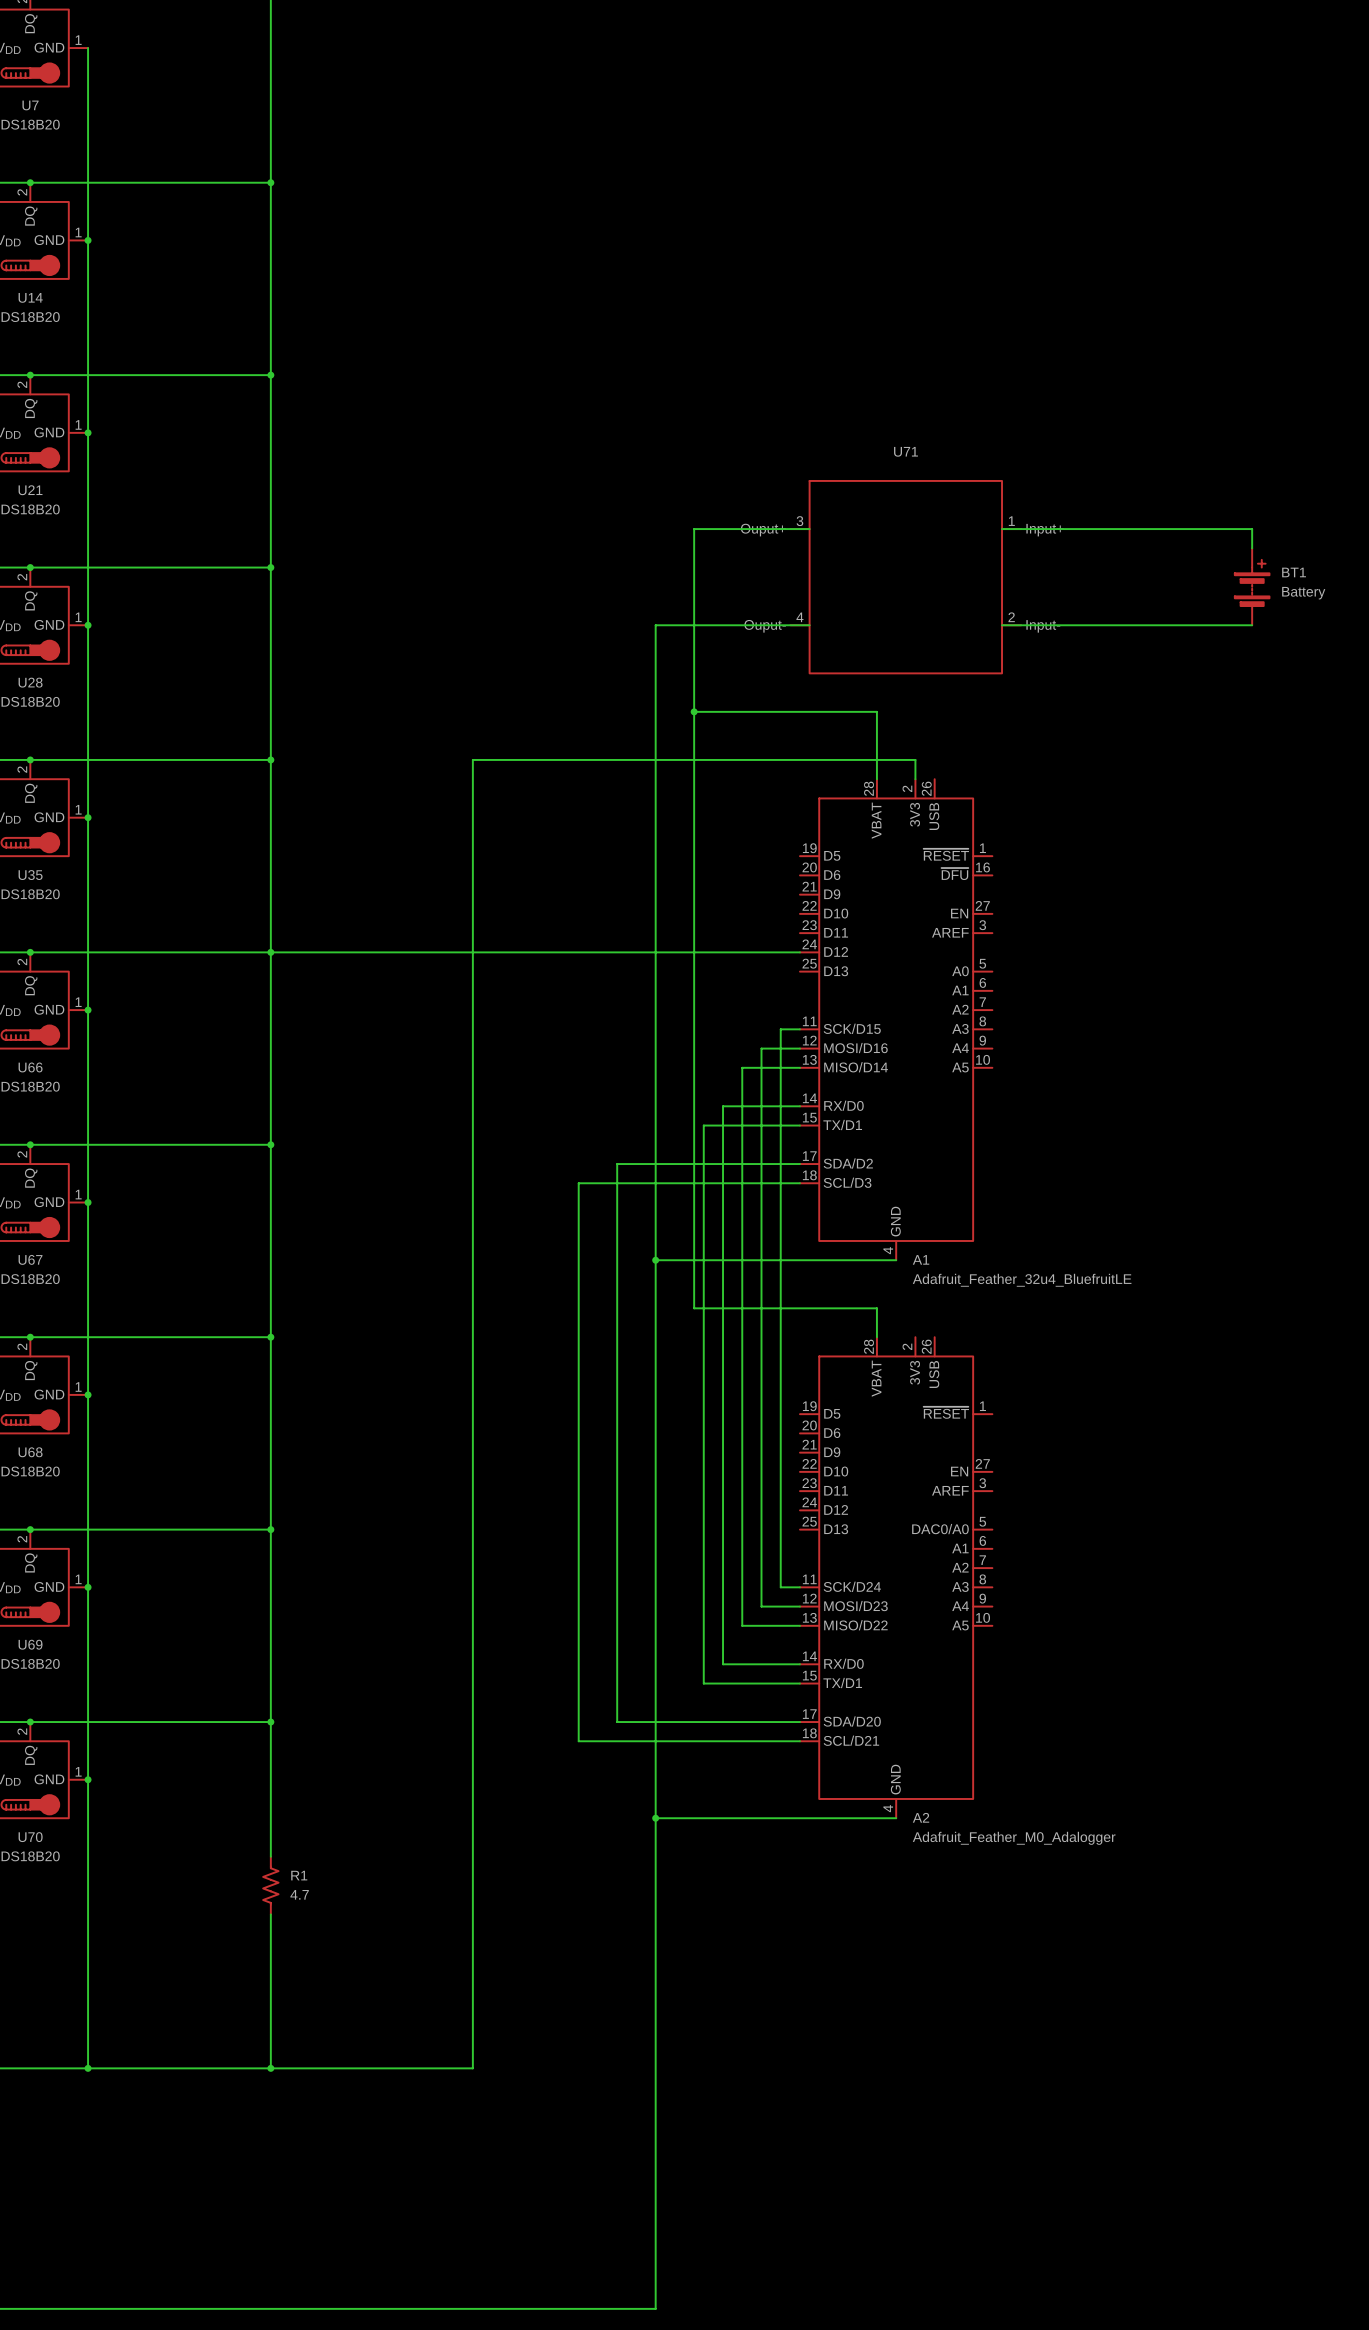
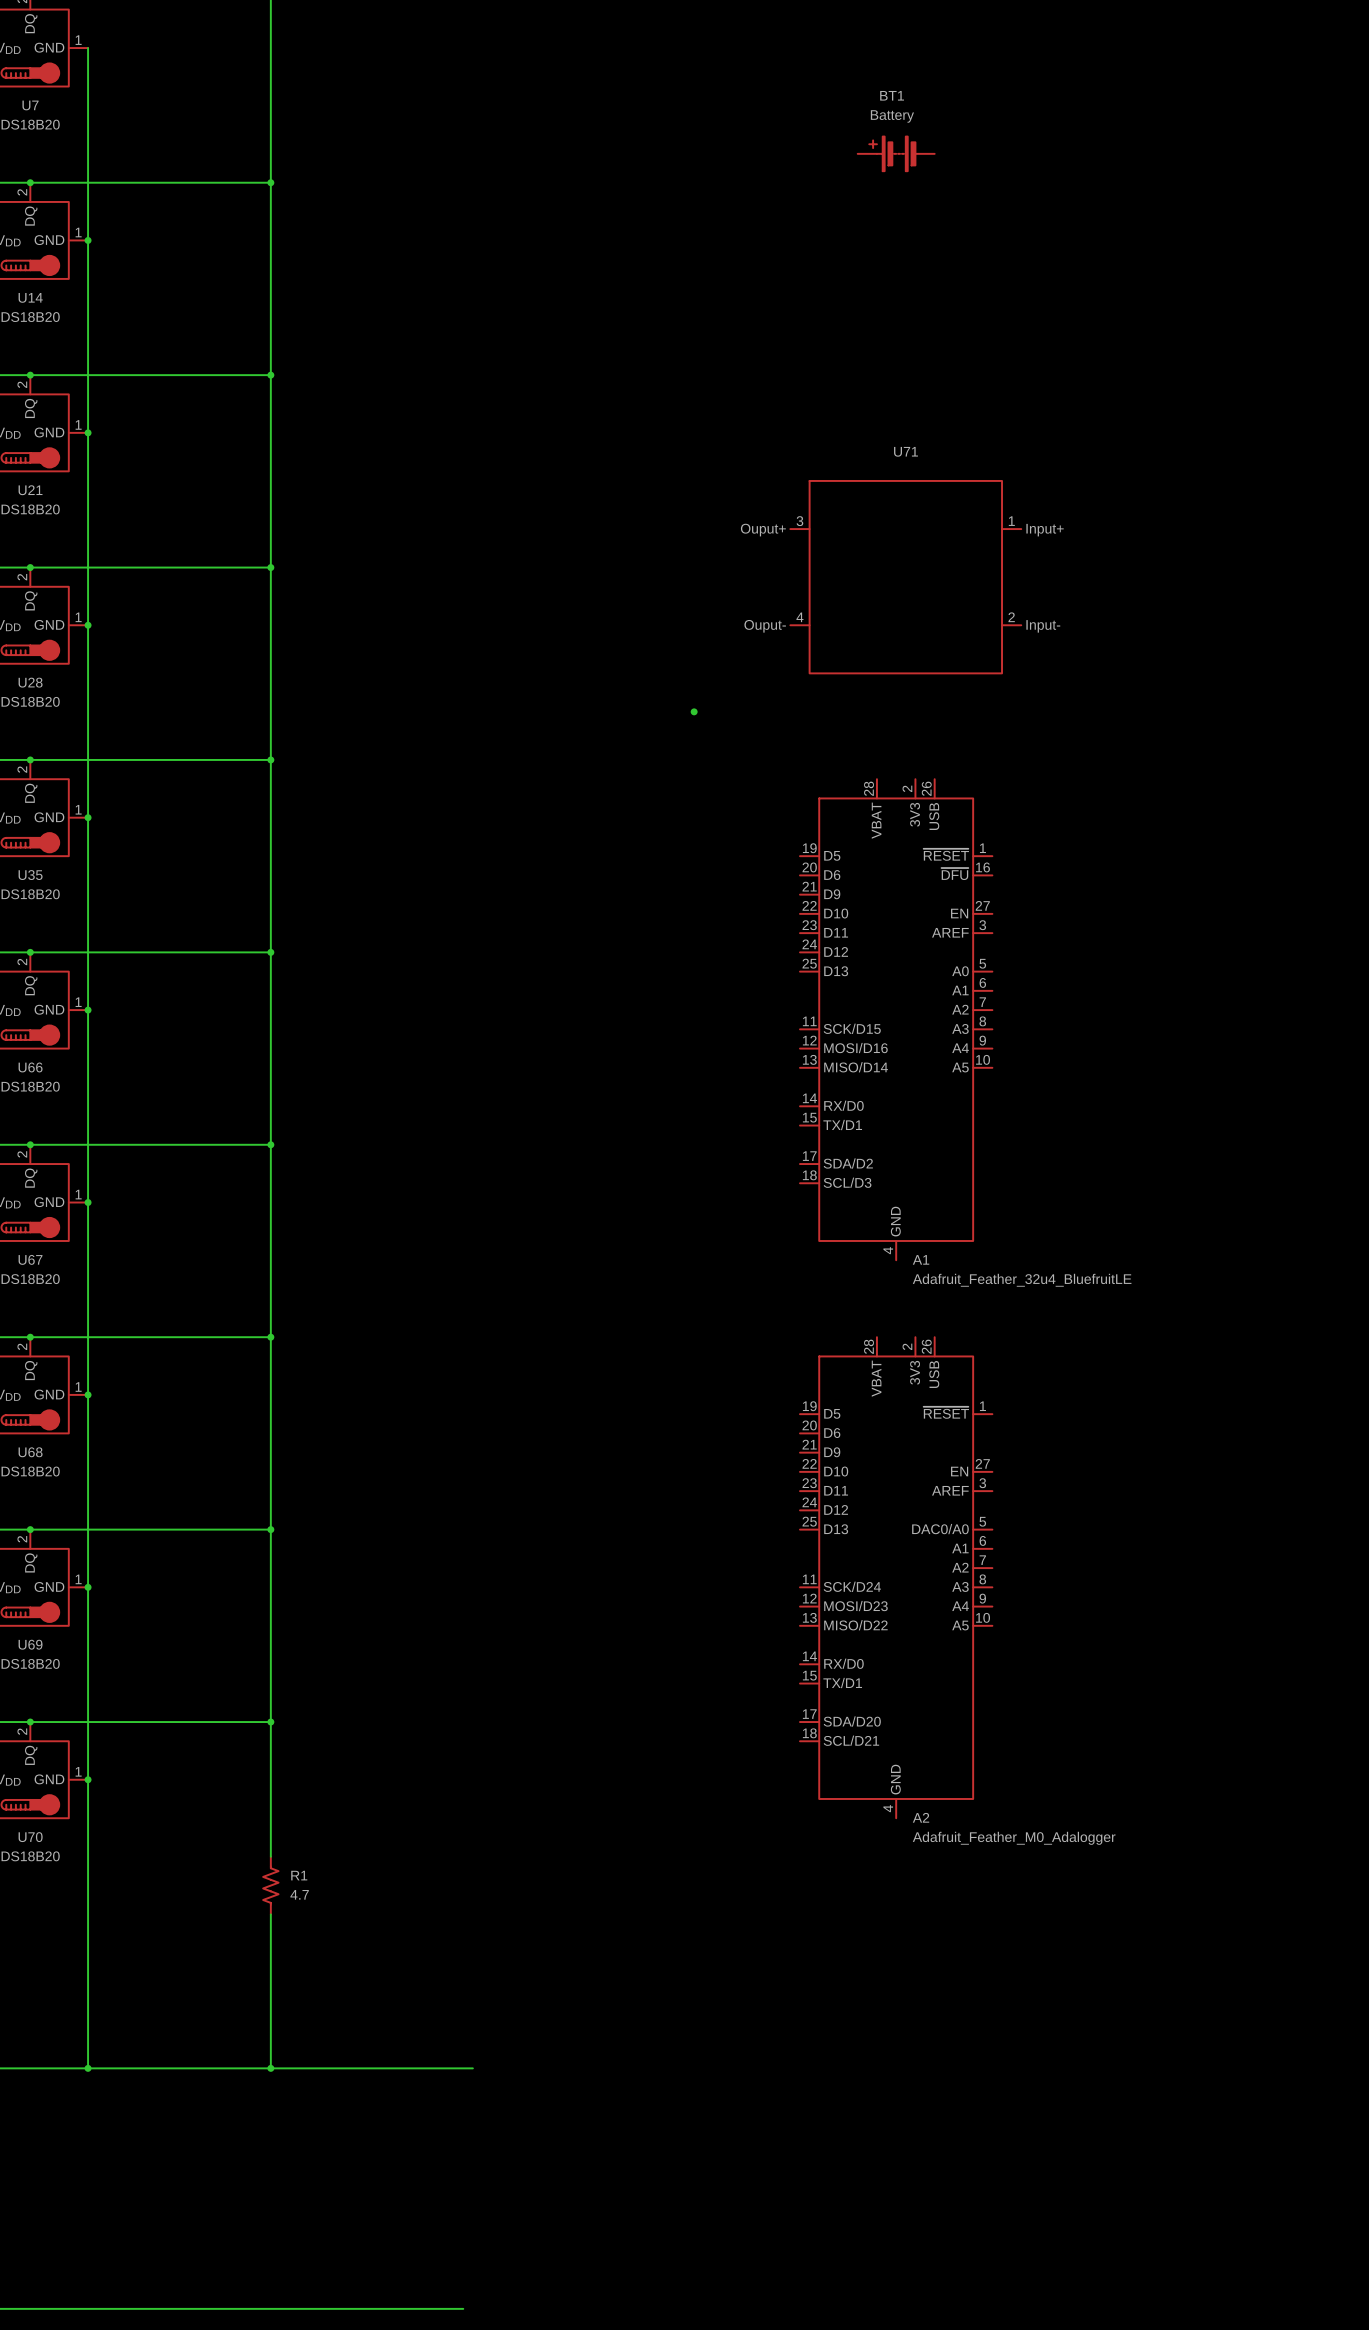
wire: (809, 529) (694, 529) (694, 1308) (876, 1308) (876, 1337) -> none
wire: (1002, 529) (1252, 529) (1252, 548) -> none
BT1 name position: BT1 (1294, 572) -> BT1 (892, 95)
BT1 rotation: 0° (1252, 582) -> 90° counterclockwise (891, 153)
BT1 position: (1252, 586) -> (896, 153)
BT1 value position: Battery (1303, 593) -> Battery (892, 116)
wire: (809, 625) (655, 625) (655, 2308) (463, 2308) -> none
wire: (1002, 625) (1252, 625) -> none
wire: (694, 711) (876, 711) (876, 779) -> none
wire: (915, 779) (915, 759) (472, 759) (472, 2068) -> none
wire: (270, 952) (799, 952) -> none
wire: (799, 1029) (780, 1029) (780, 1587) (799, 1587) -> none
wire: (799, 1048) (761, 1048) (761, 1606) (799, 1606) -> none
wire: (799, 1067) (742, 1067) (742, 1625) (799, 1625) -> none
wire: (799, 1106) (723, 1106) (723, 1664) (799, 1664) -> none
wire: (799, 1125) (703, 1125) (703, 1683) (799, 1683) -> none
wire: (799, 1164) (617, 1164) (617, 1722) (799, 1722) -> none
wire: (799, 1183) (578, 1183) (578, 1741) (799, 1741) -> none
wire: (655, 1260) (896, 1260) -> none
junction: (655, 1260) -> none
wire: (655, 1818) (896, 1818) -> none
junction: (655, 1818) -> none

